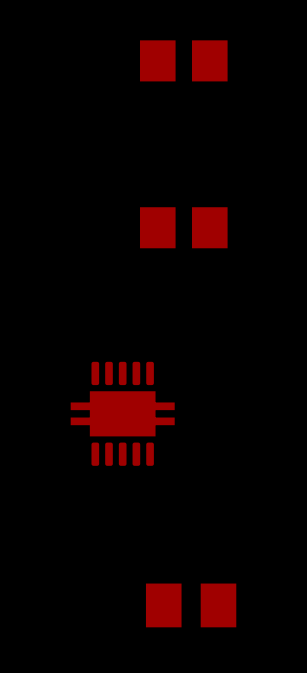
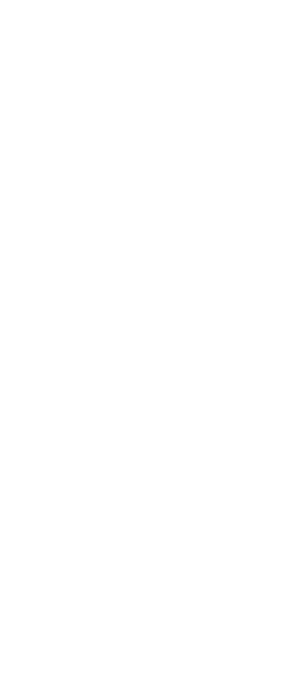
part: (183, 60) -> none
part: (183, 227) -> none
part: (122, 413) -> none
part: (191, 605) -> none

